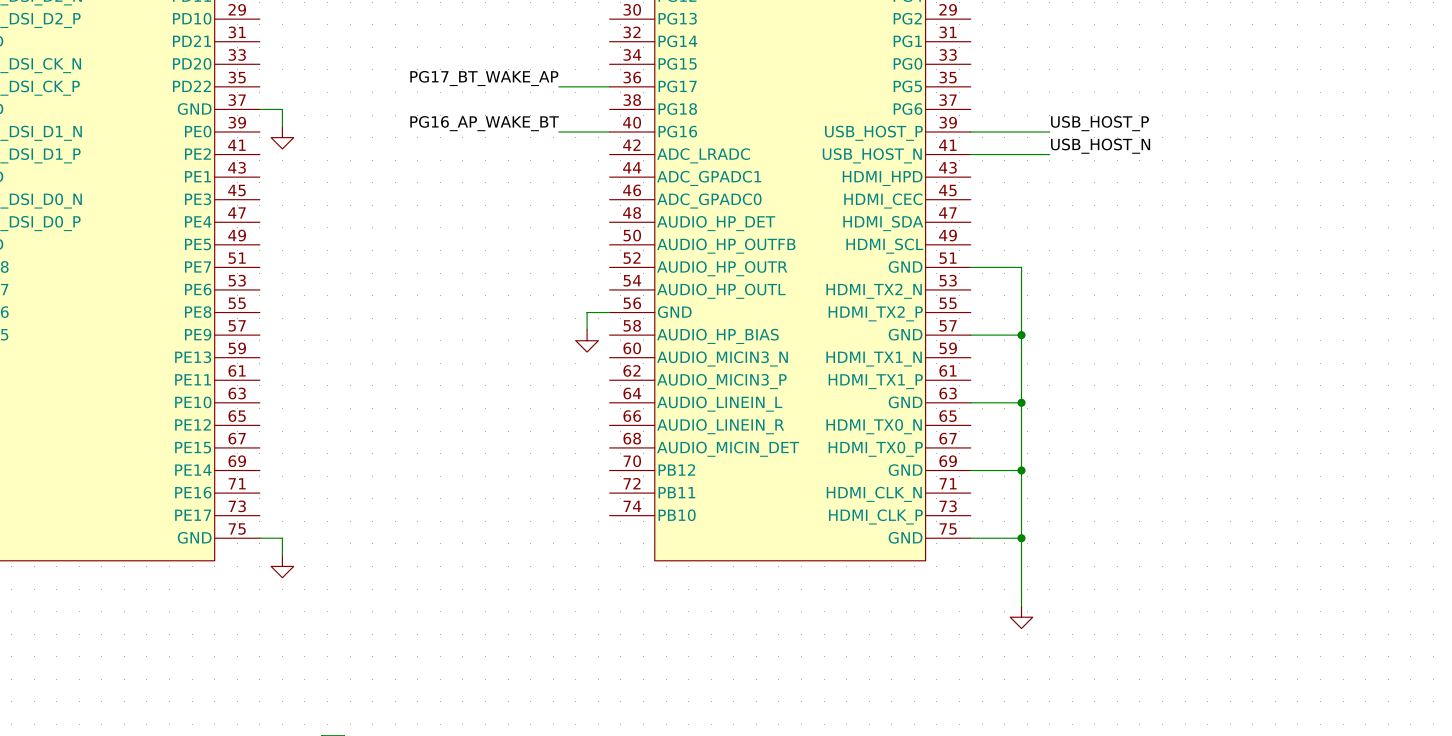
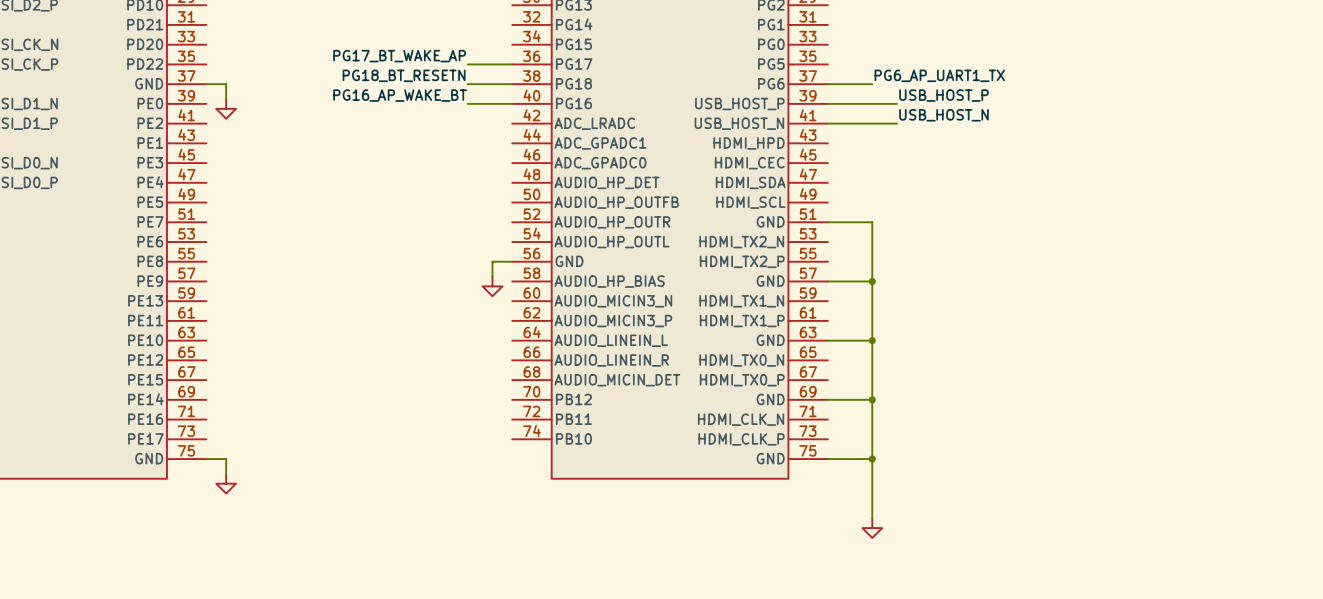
label: none -> PG18_BT_RESETN (404, 75)
label: none -> PG6_AP_UART1_TX (939, 75)
wire: none -> (467, 84) (512, 84)
wire: none -> (827, 84) (872, 84)

